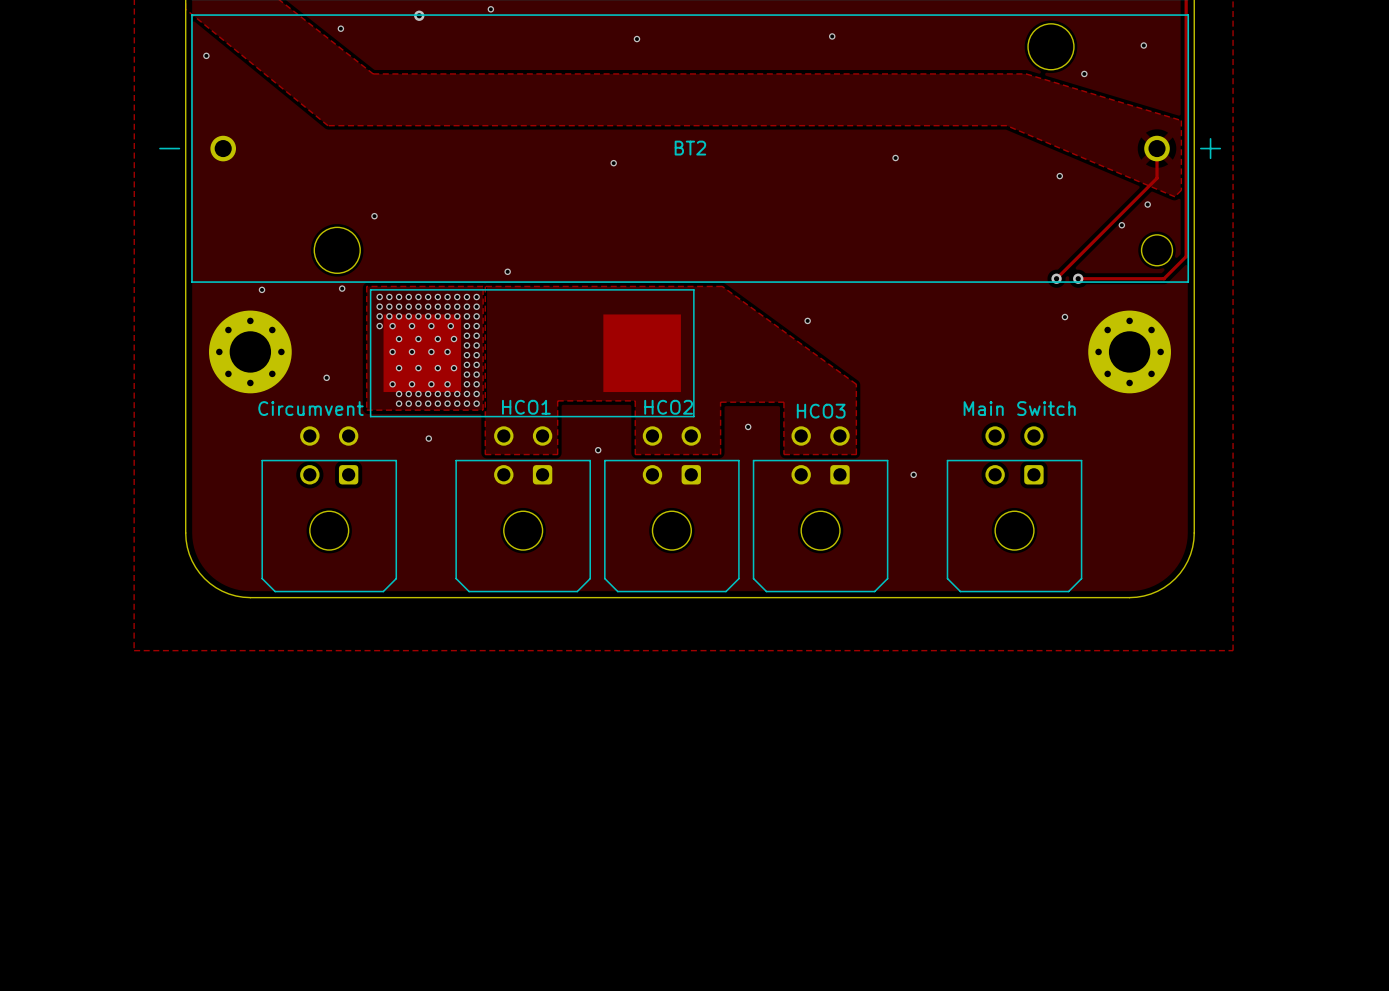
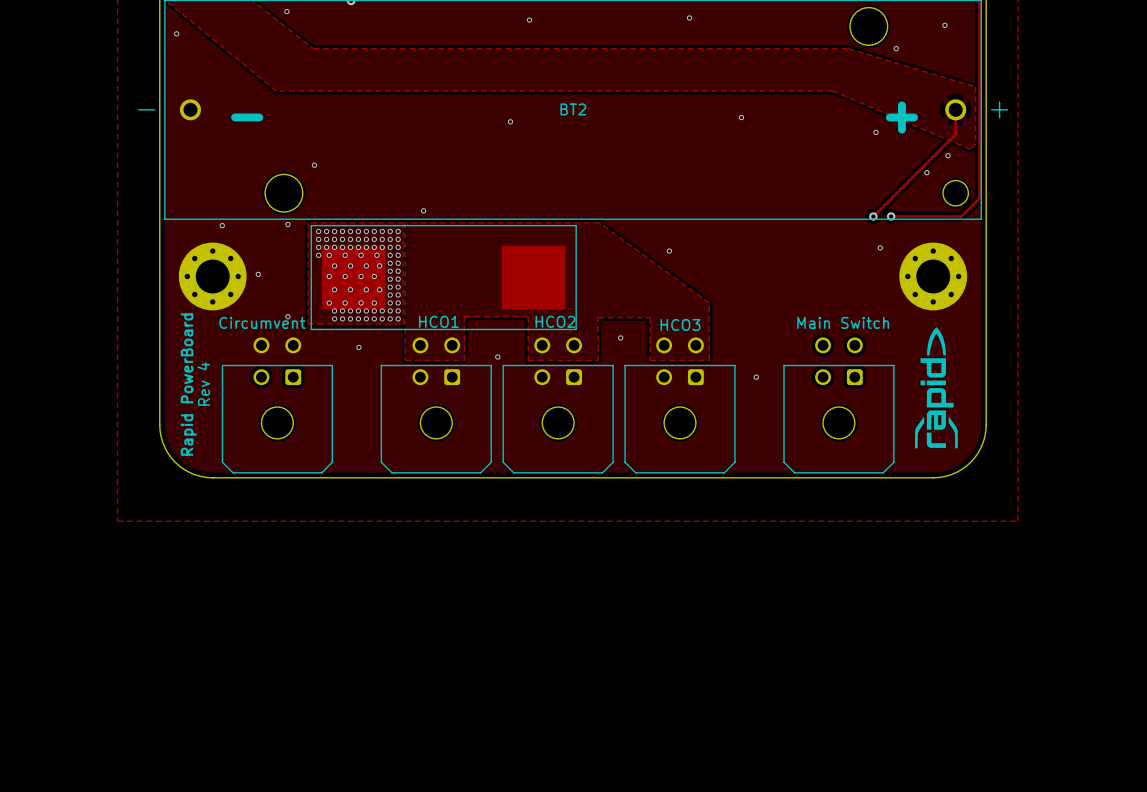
text: none -> - (247, 117)
text: none -> + (901, 117)
via: none -> (258, 274)
via: (326, 377) -> none
via: none -> (287, 316)
drawing: none -> [914, 327, 958, 449]
text: none -> Rapid PowerBoard (188, 384)
text: none -> Rev 4 (203, 384)

